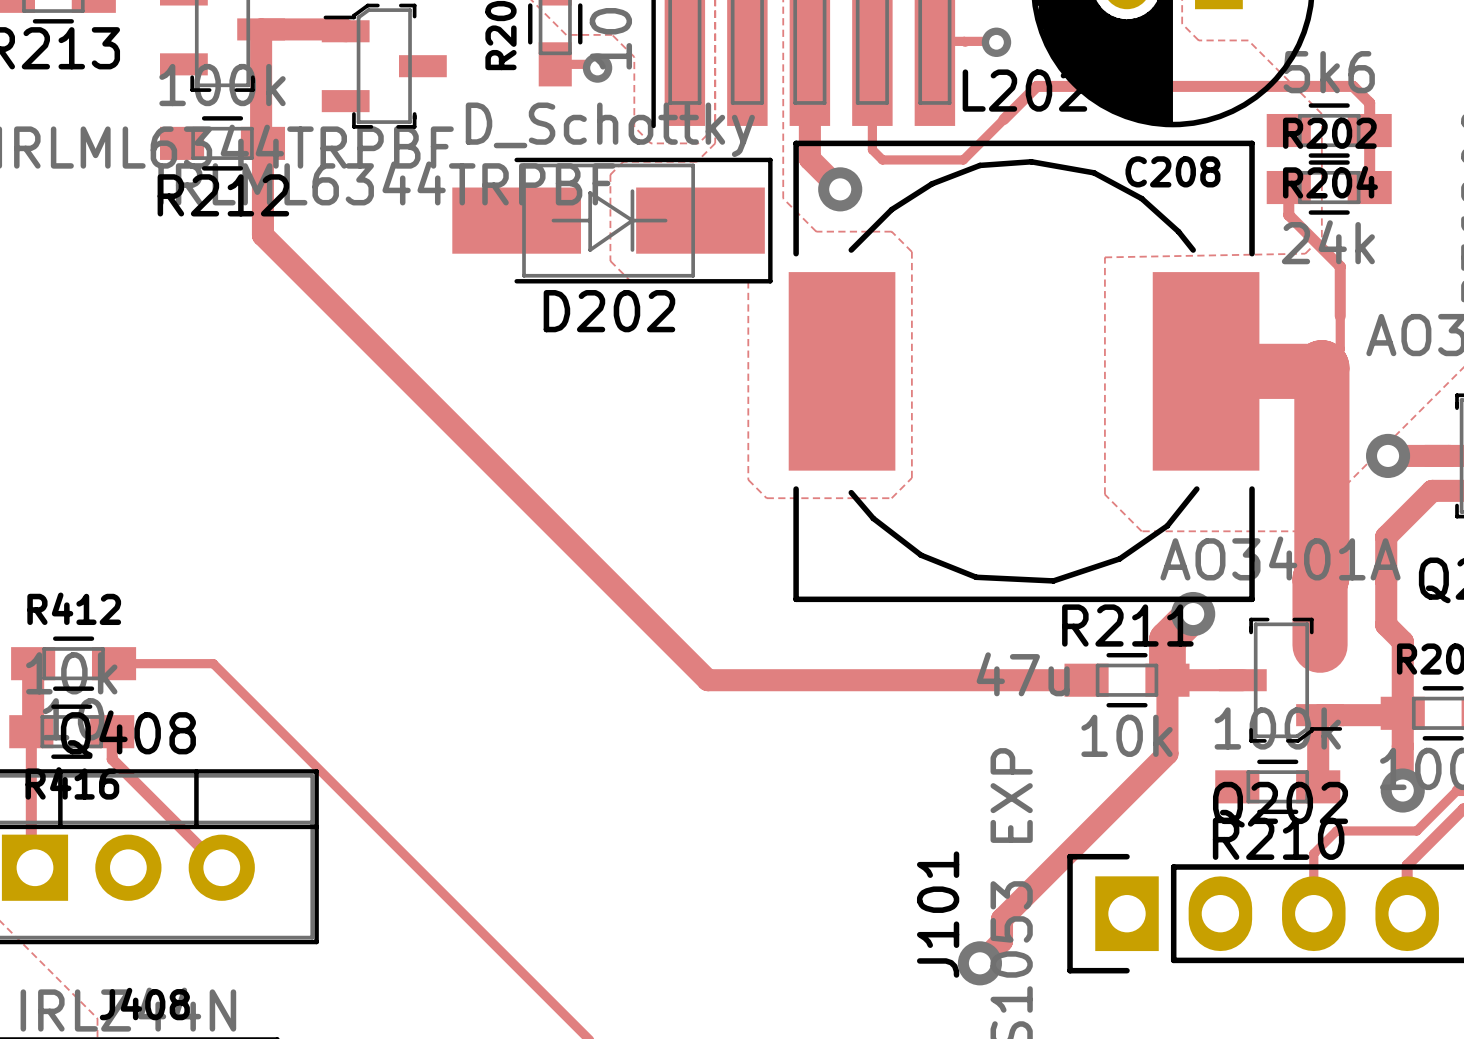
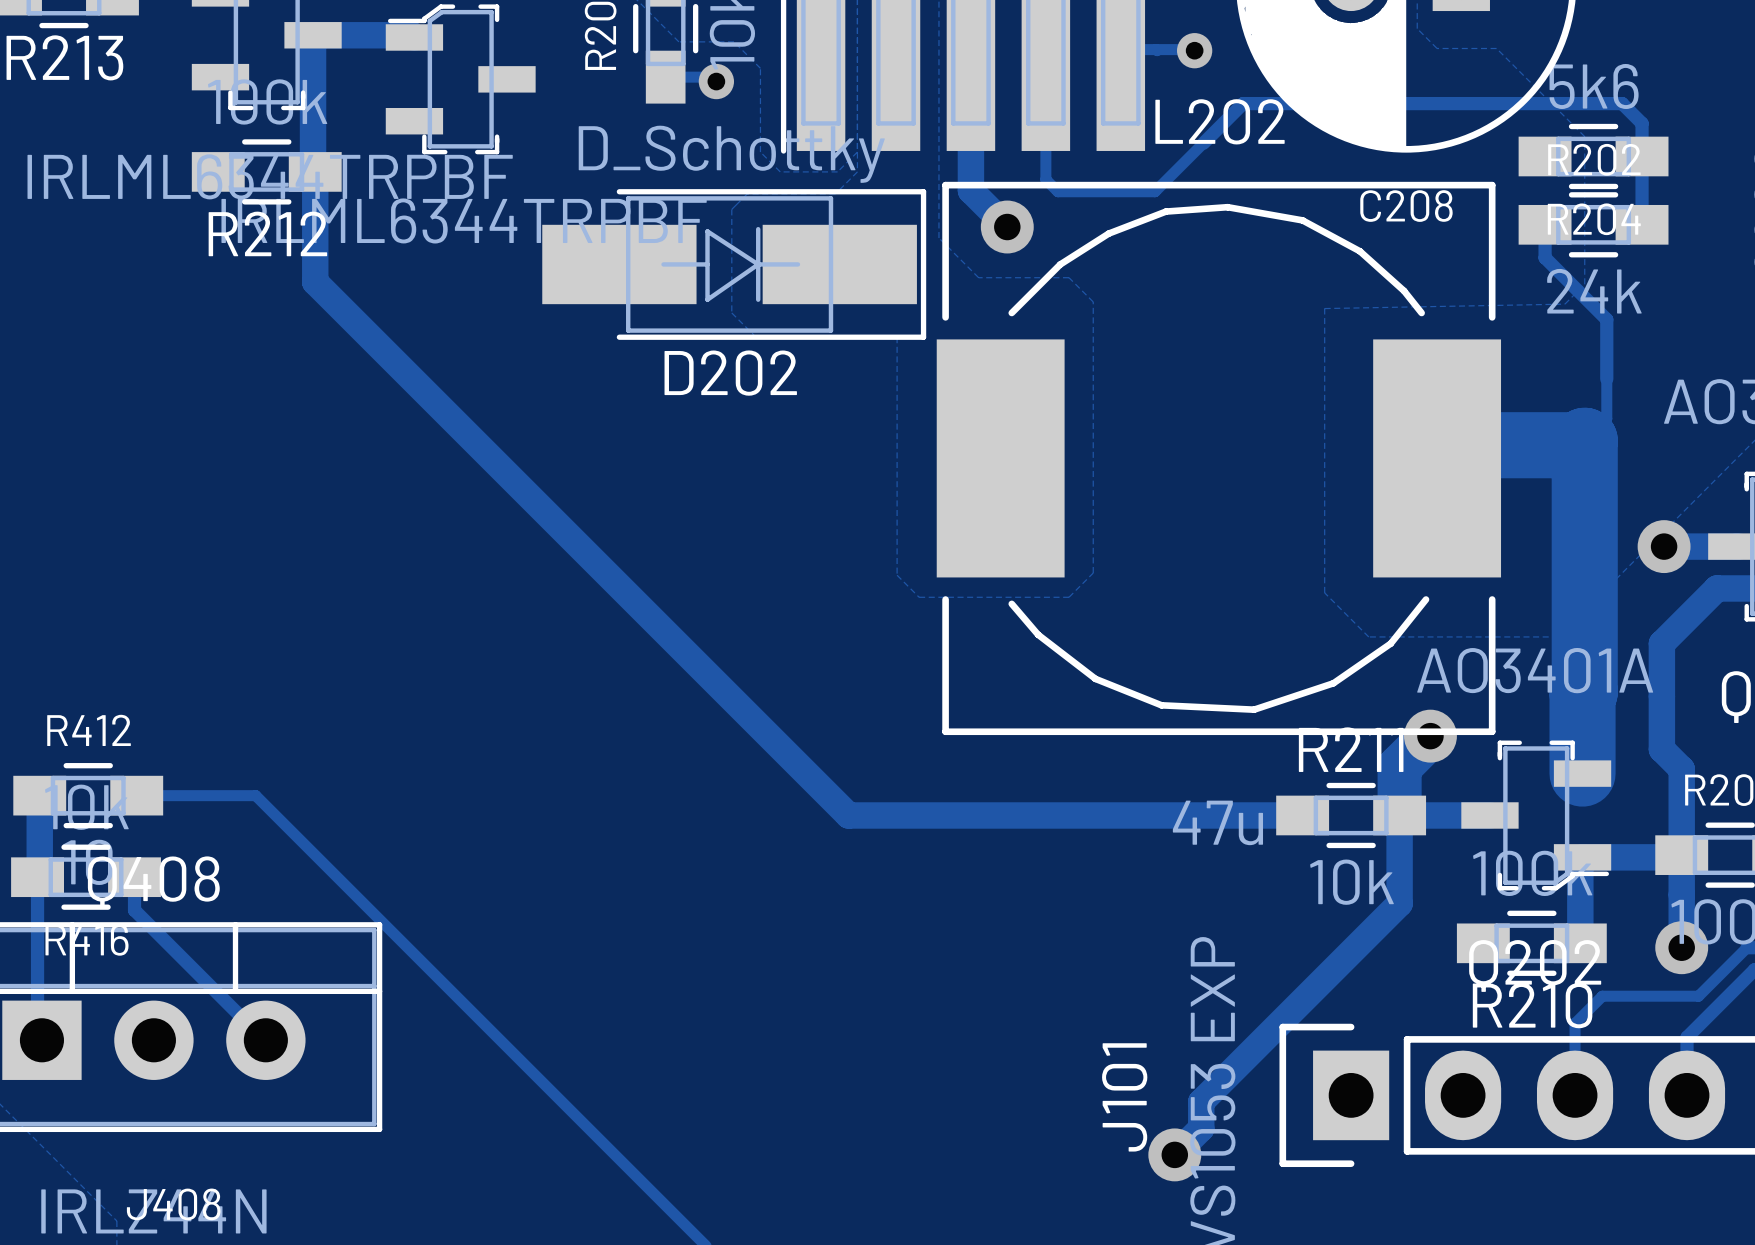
L202 position: (1024, 371) -> (1218, 458)

